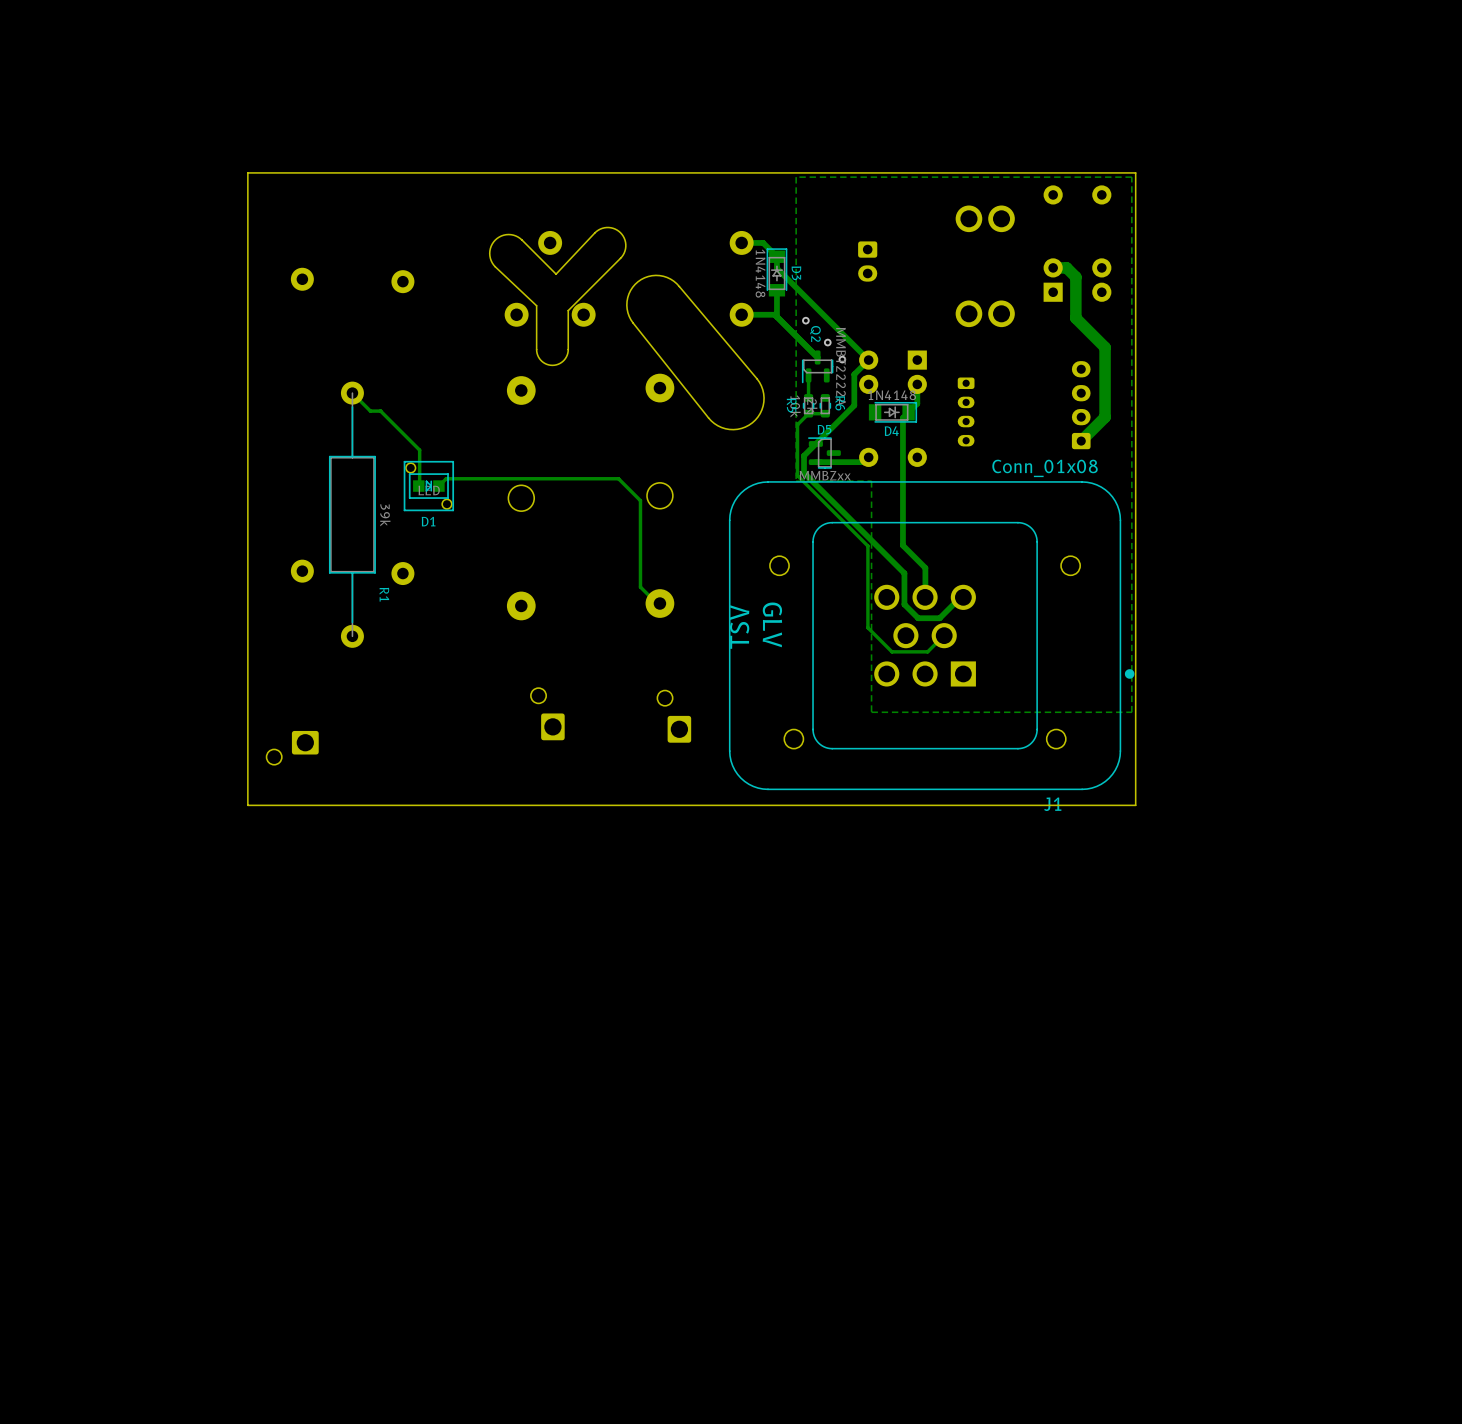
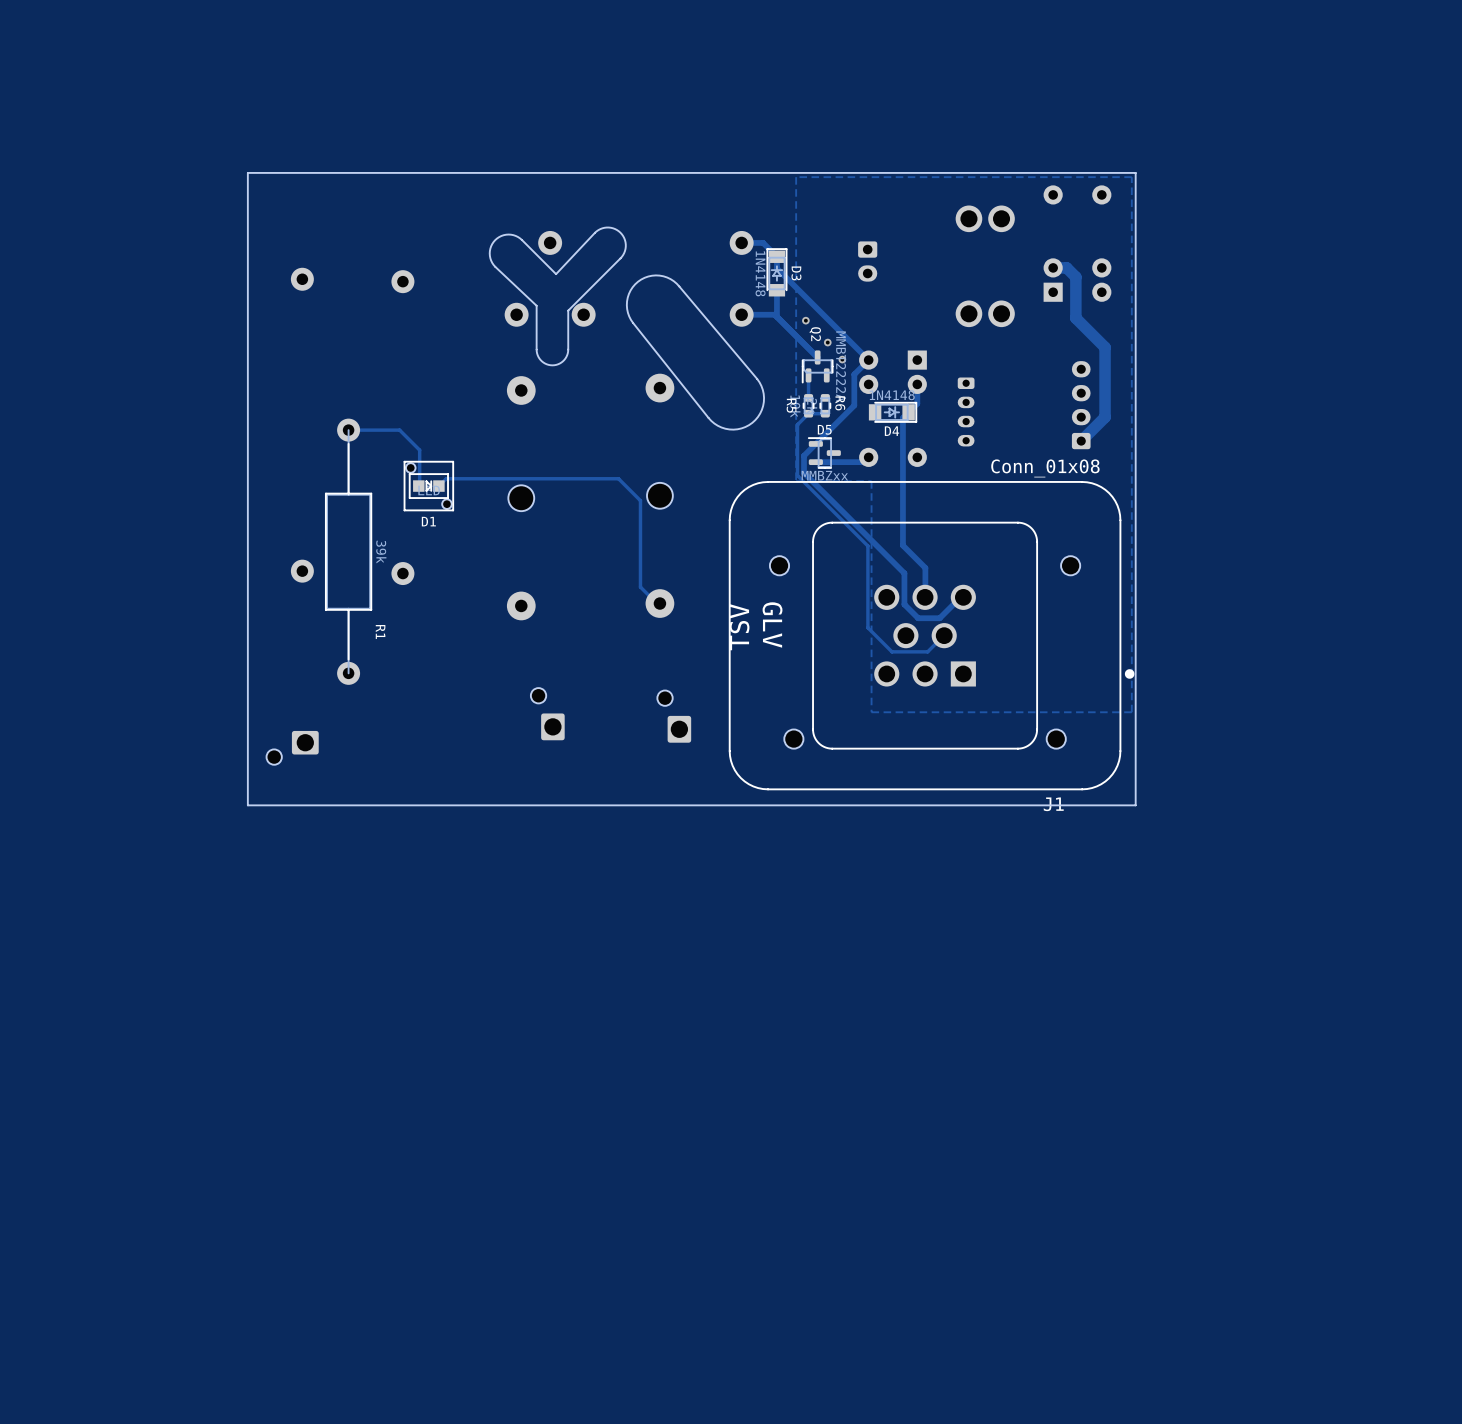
track: (352, 393) (370, 411) (380, 411) (399, 430) -> (348, 430) (399, 430)
R1 position: (352, 514) -> (348, 551)

